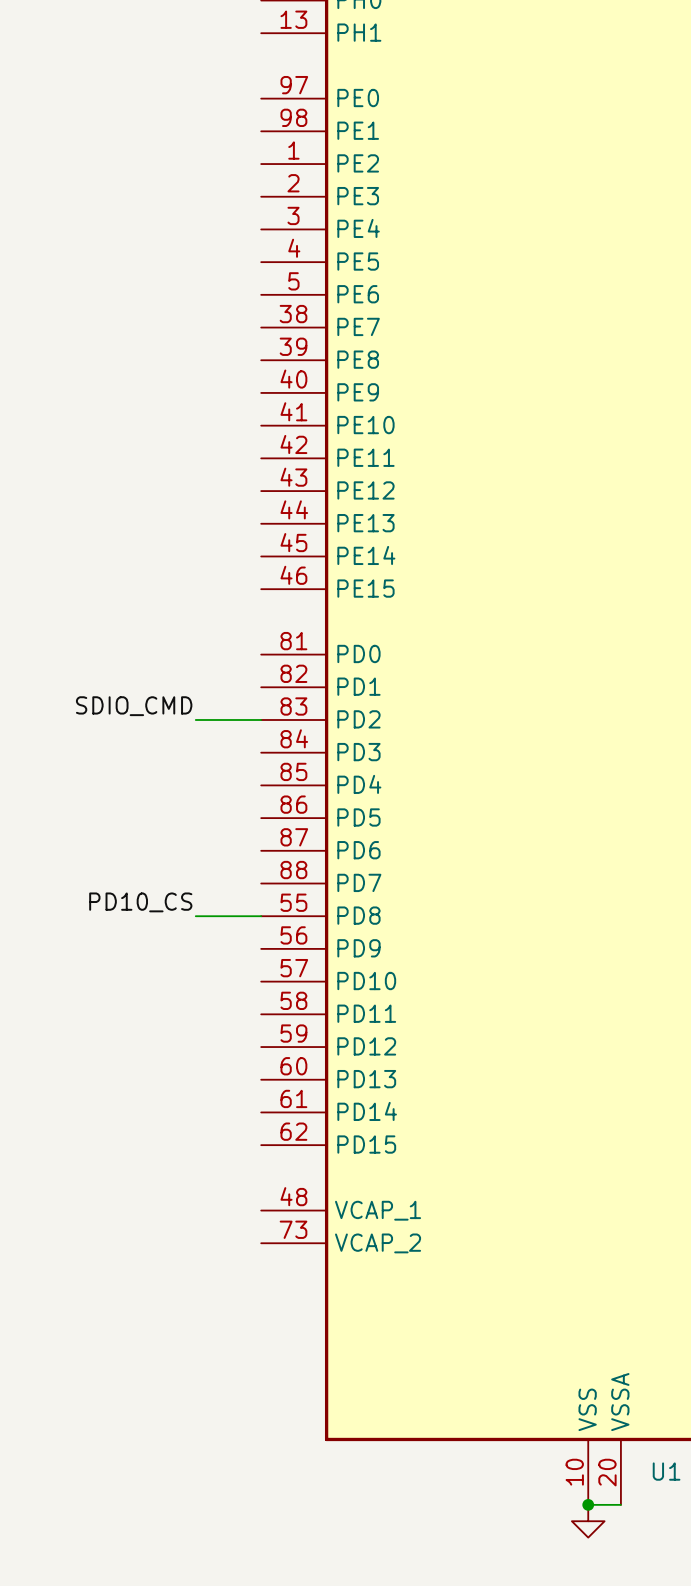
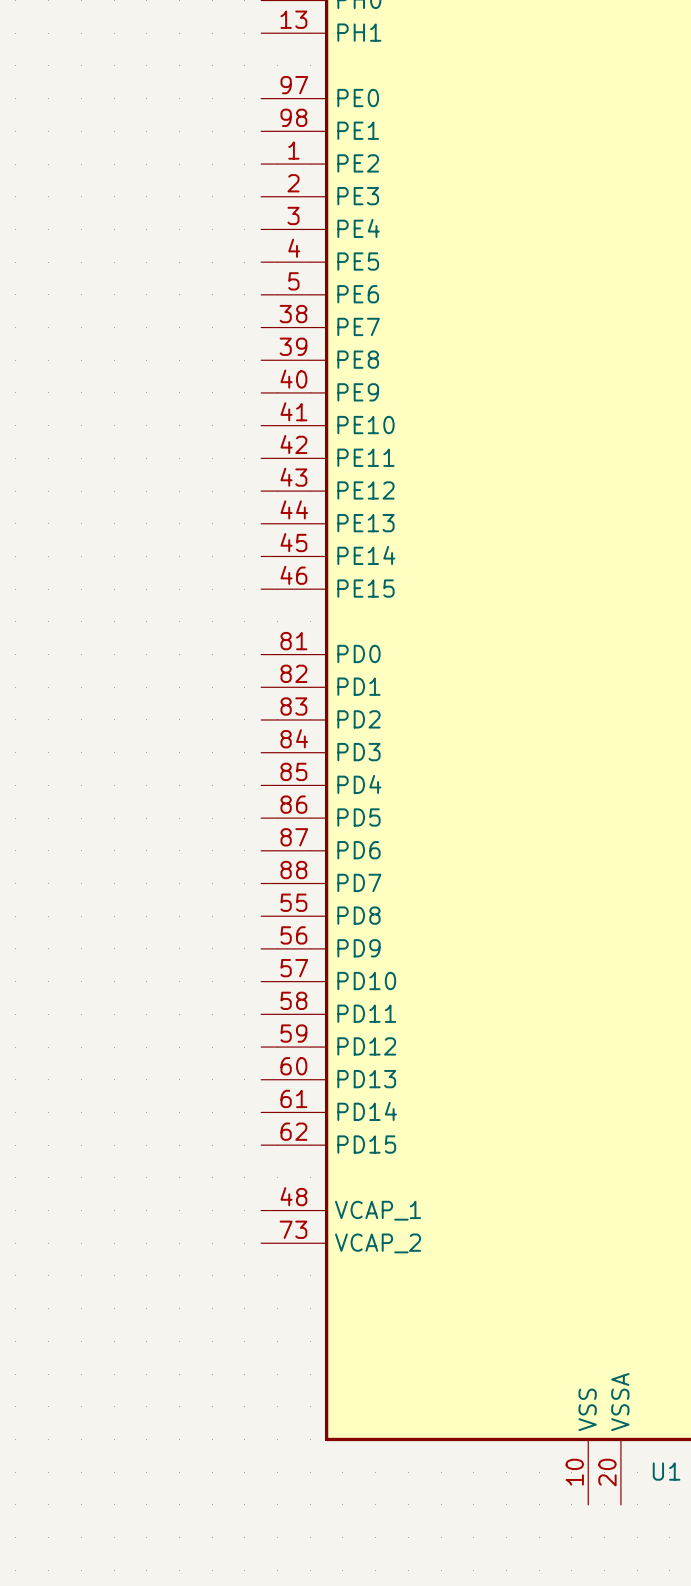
label: SDIO_CMD (134, 706) -> none
wire: (195, 719) (261, 719) -> none
label: PD10_CS (140, 902) -> none
wire: (195, 916) (261, 916) -> none
wire: (588, 1504) (620, 1504) -> none
junction: (588, 1504) -> none
power symbol: (588, 1521) -> none

